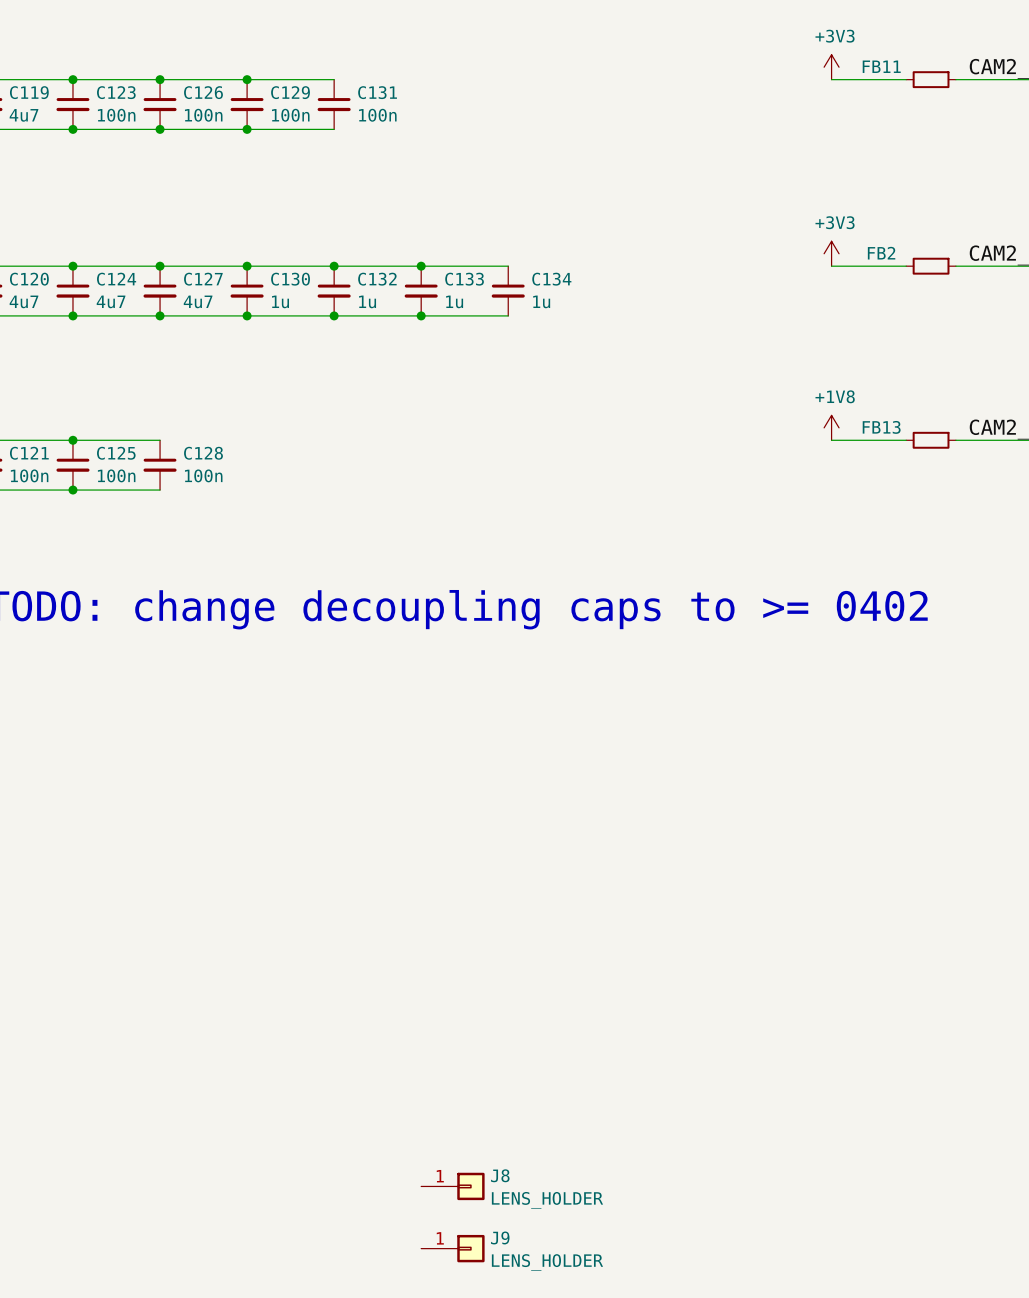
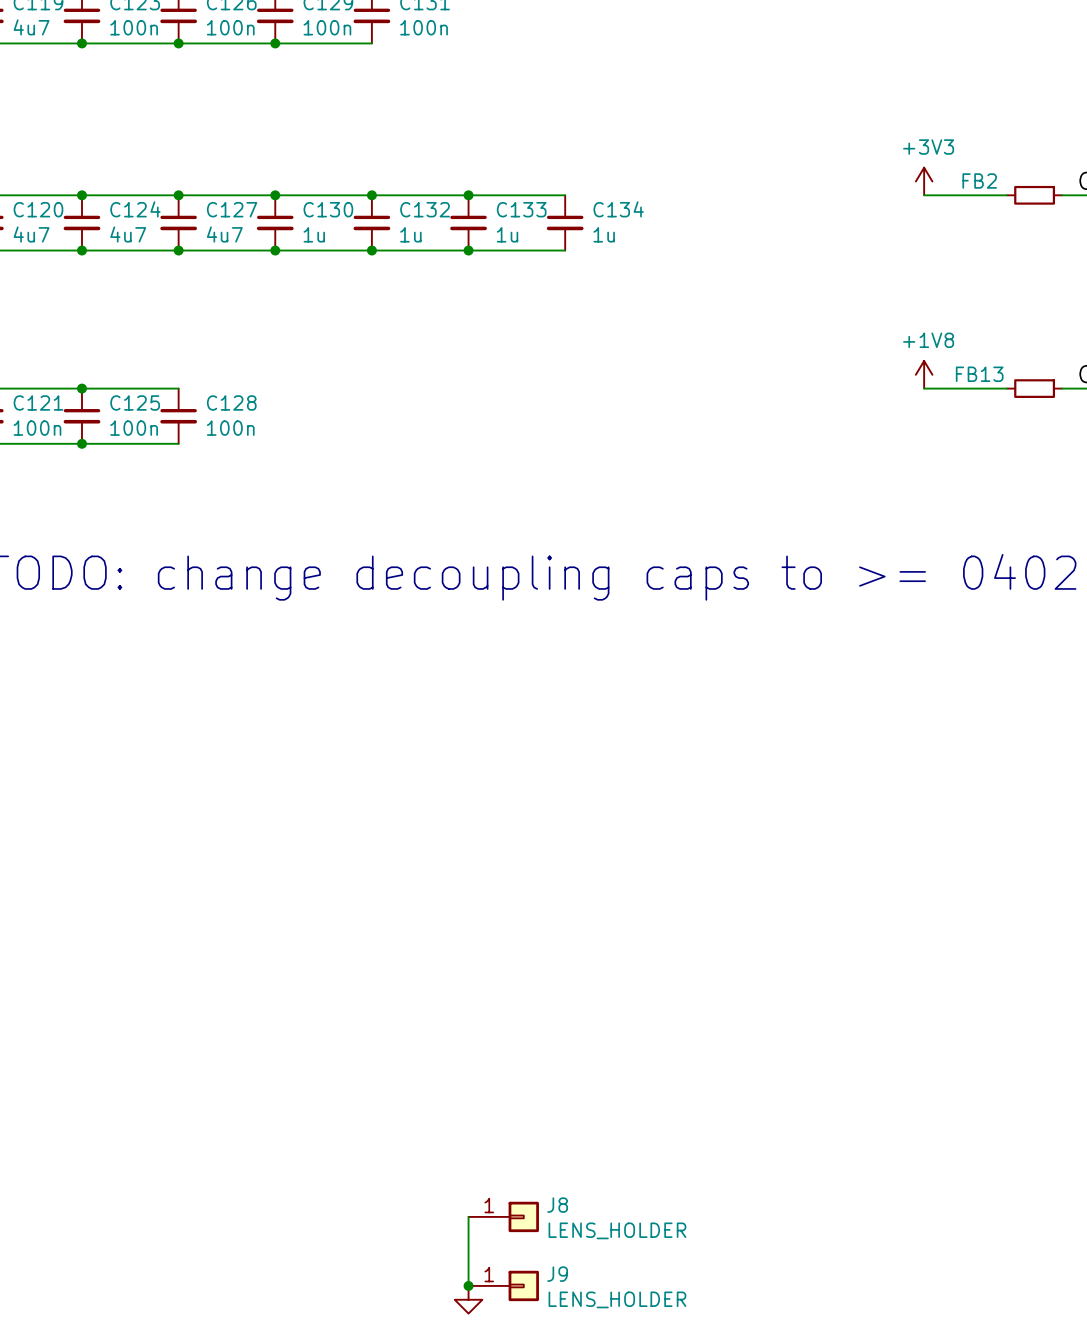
wire: none -> (468, 1216) (468, 1285)
junction: none -> (468, 1285)
power symbol: none -> (468, 1299)

